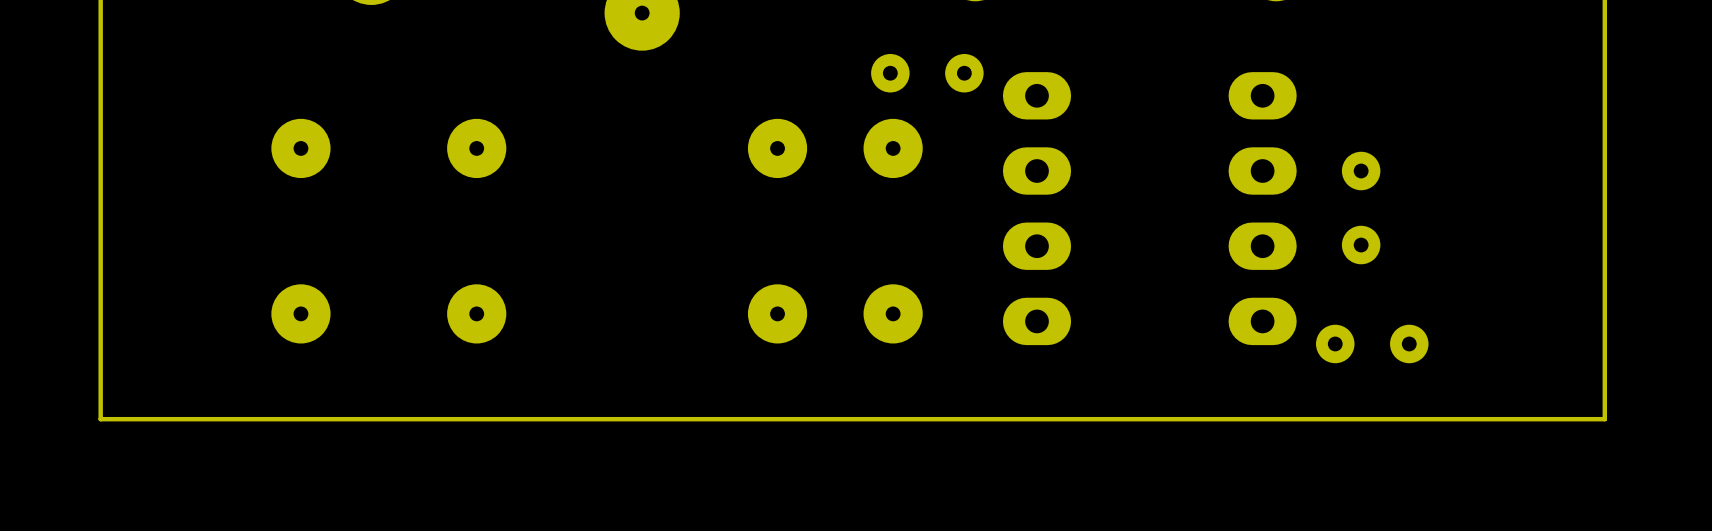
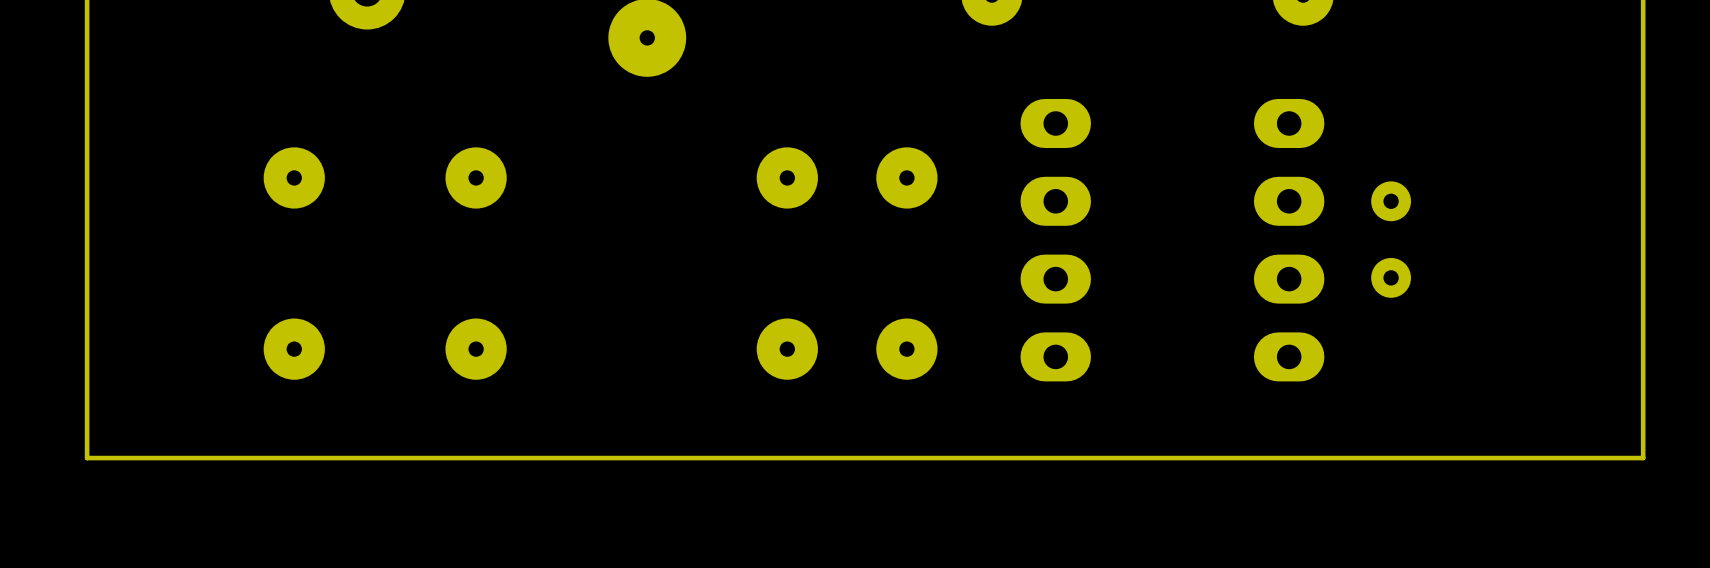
part: (927, 73) -> none
part: (1372, 343) -> none

